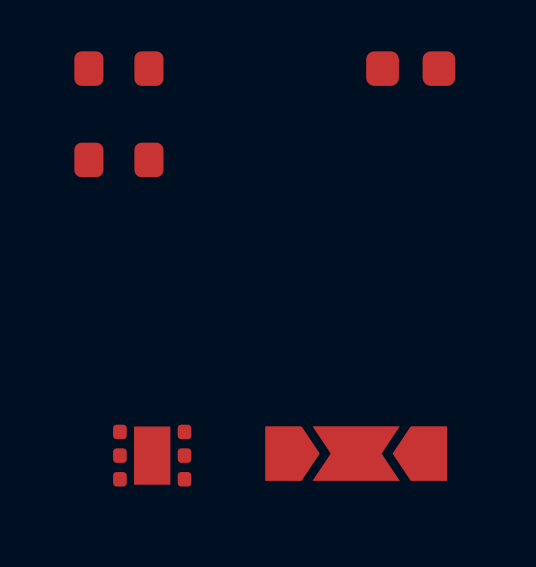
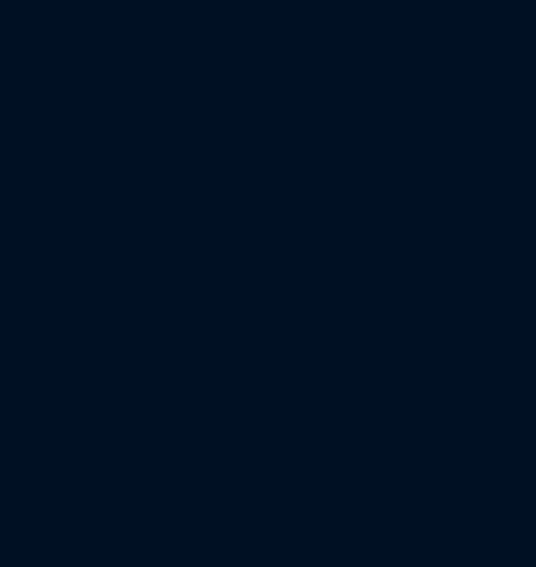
part: (118, 68) -> none
part: (410, 68) -> none
part: (118, 159) -> none
part: (356, 453) -> none
part: (152, 455) -> none

